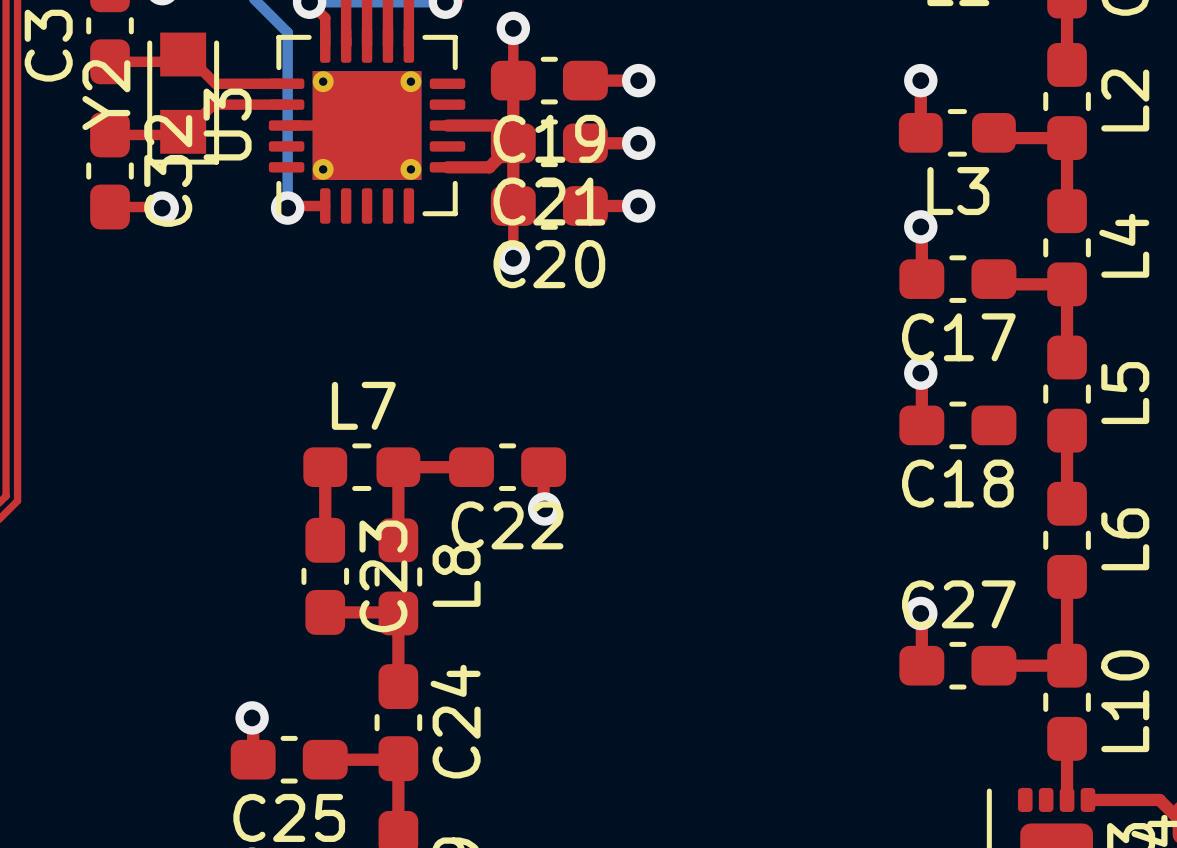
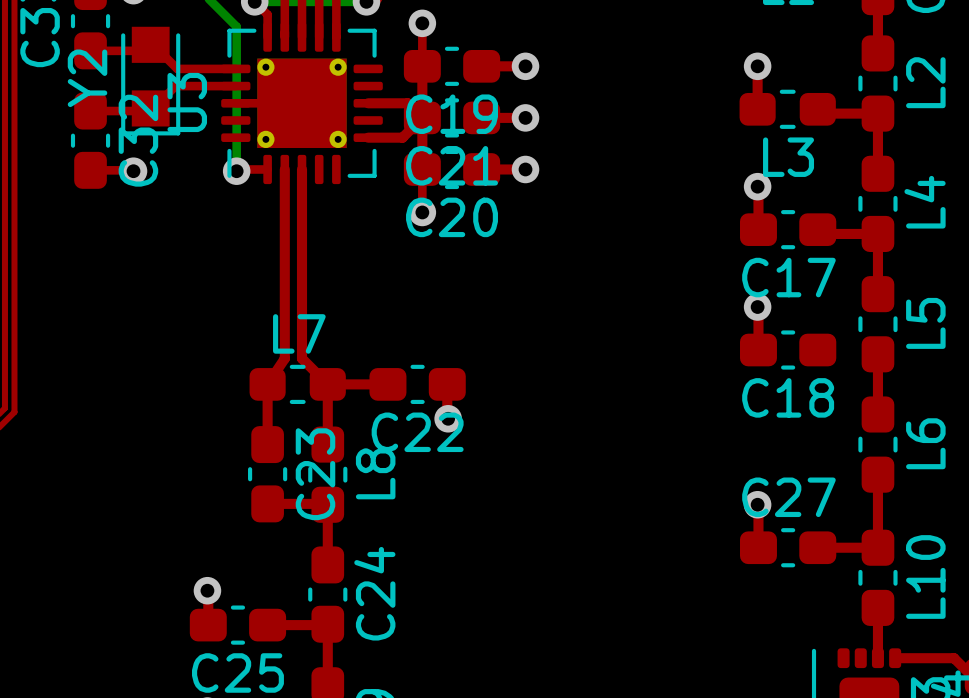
top track: none -> (284, 169) (284, 358) (267, 384)
top track: none -> (302, 169) (302, 358) (327, 384)

